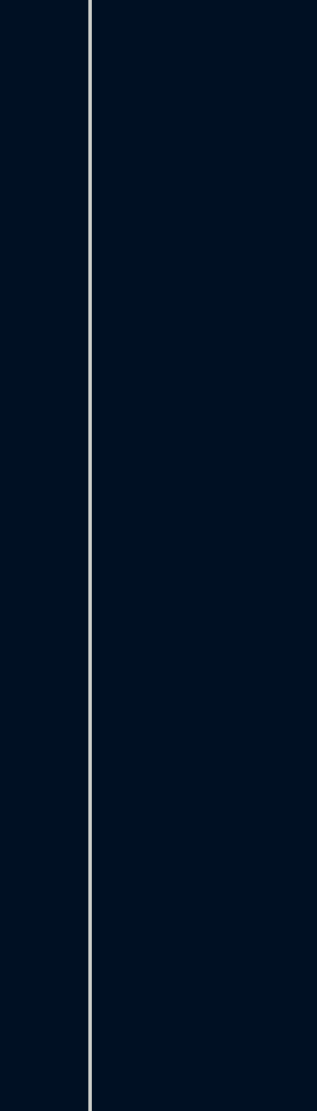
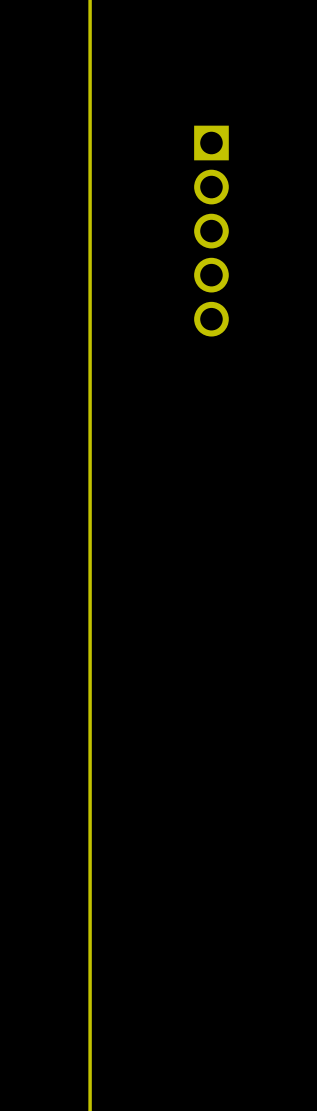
part: none -> (211, 231)

